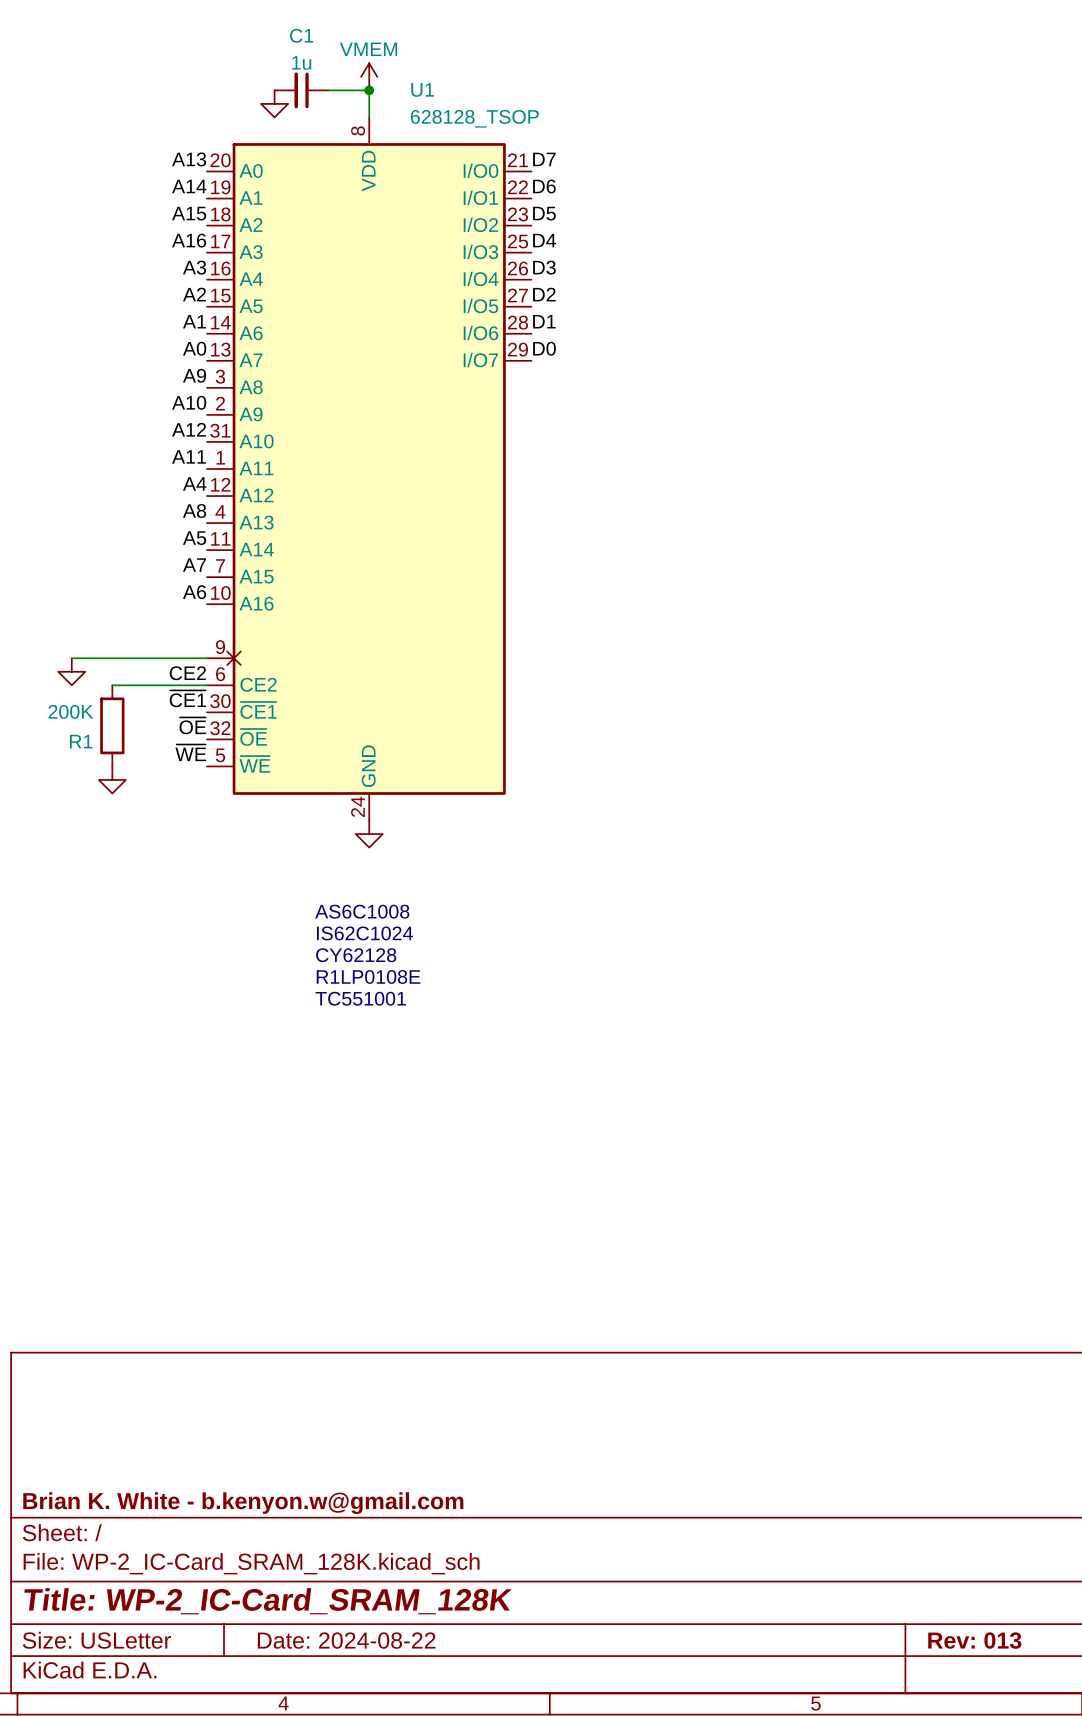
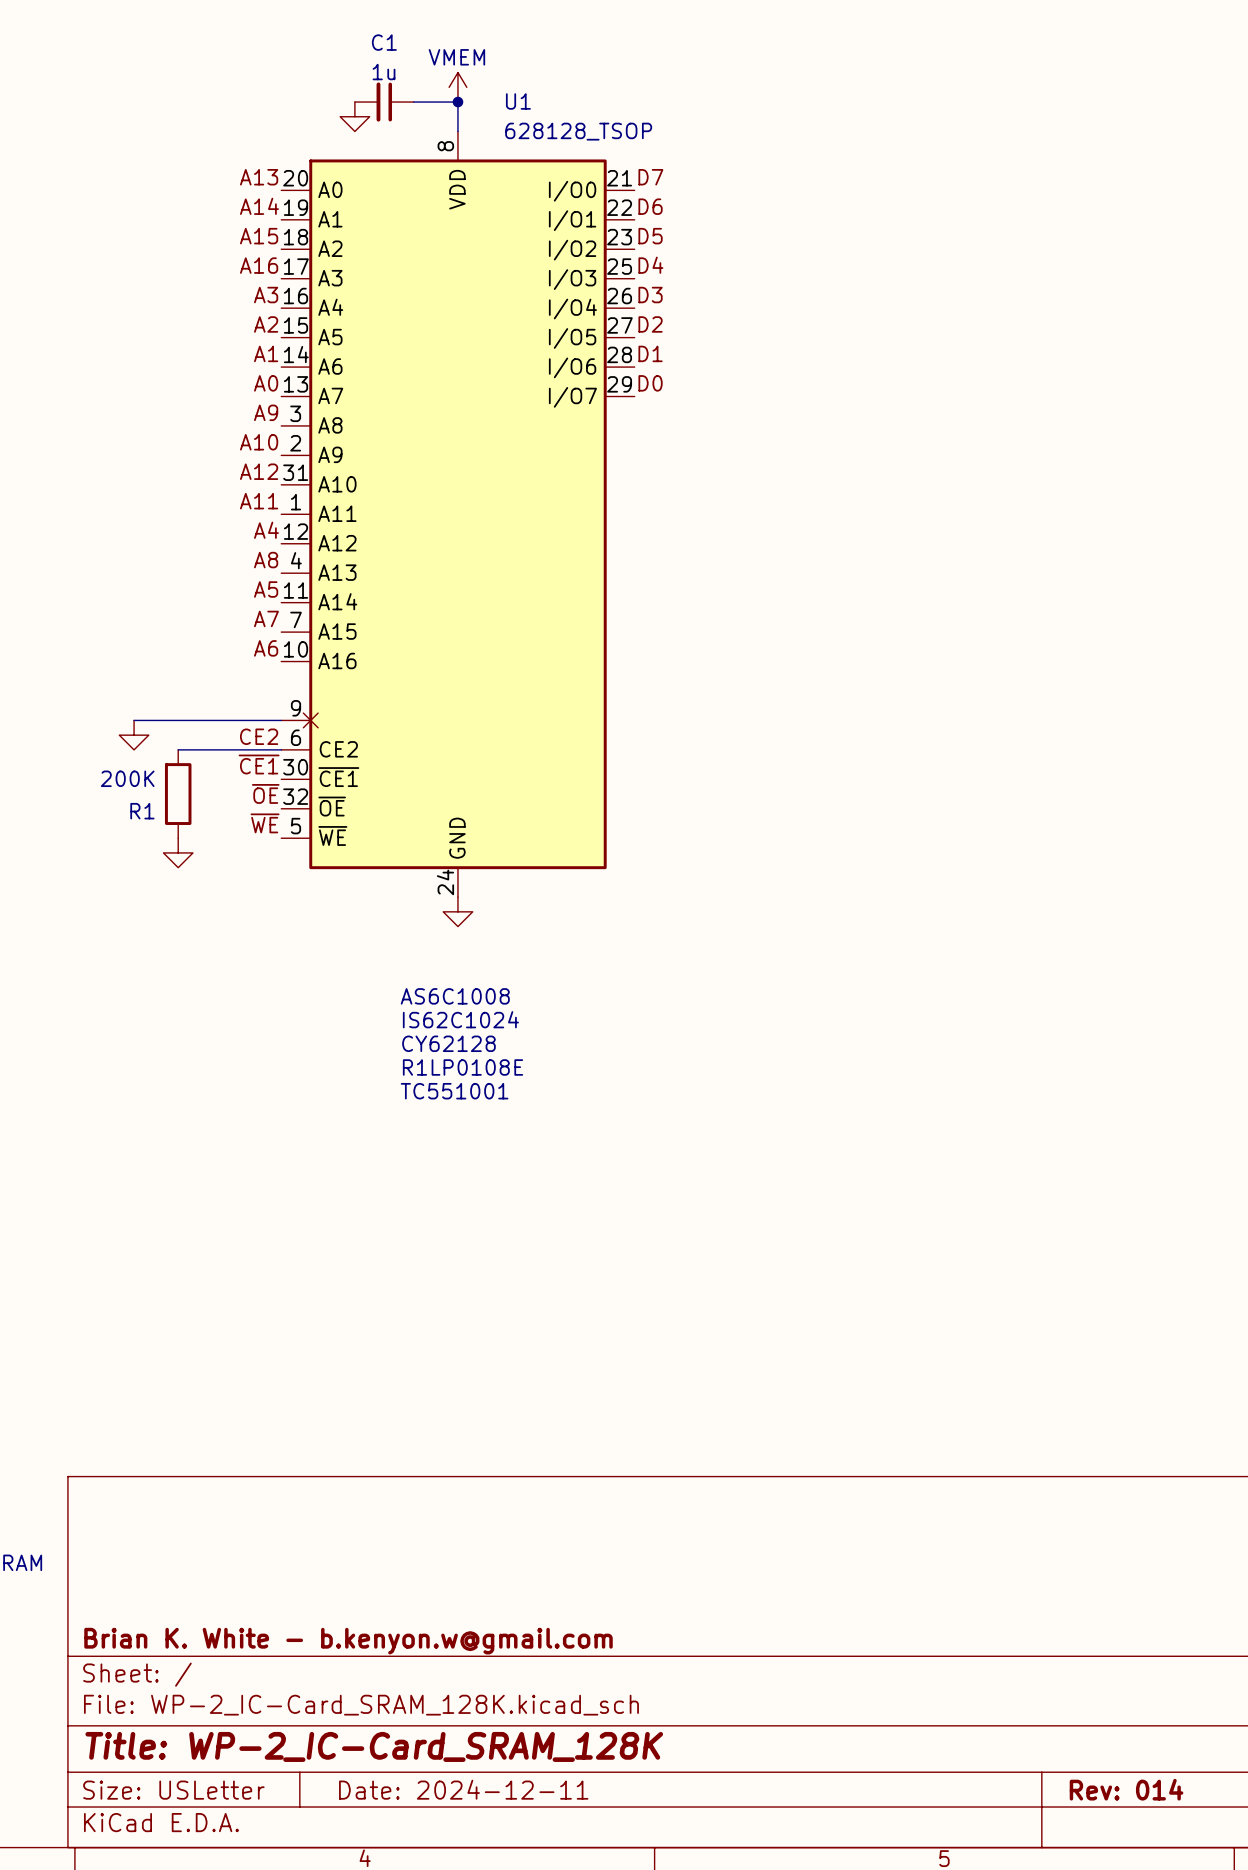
title block: Date: 2024-08-22 (346, 1640) -> Date: 2024-12-11 (463, 1789)
title block: Rev: 013 (974, 1640) -> Rev: 014 (1126, 1789)

